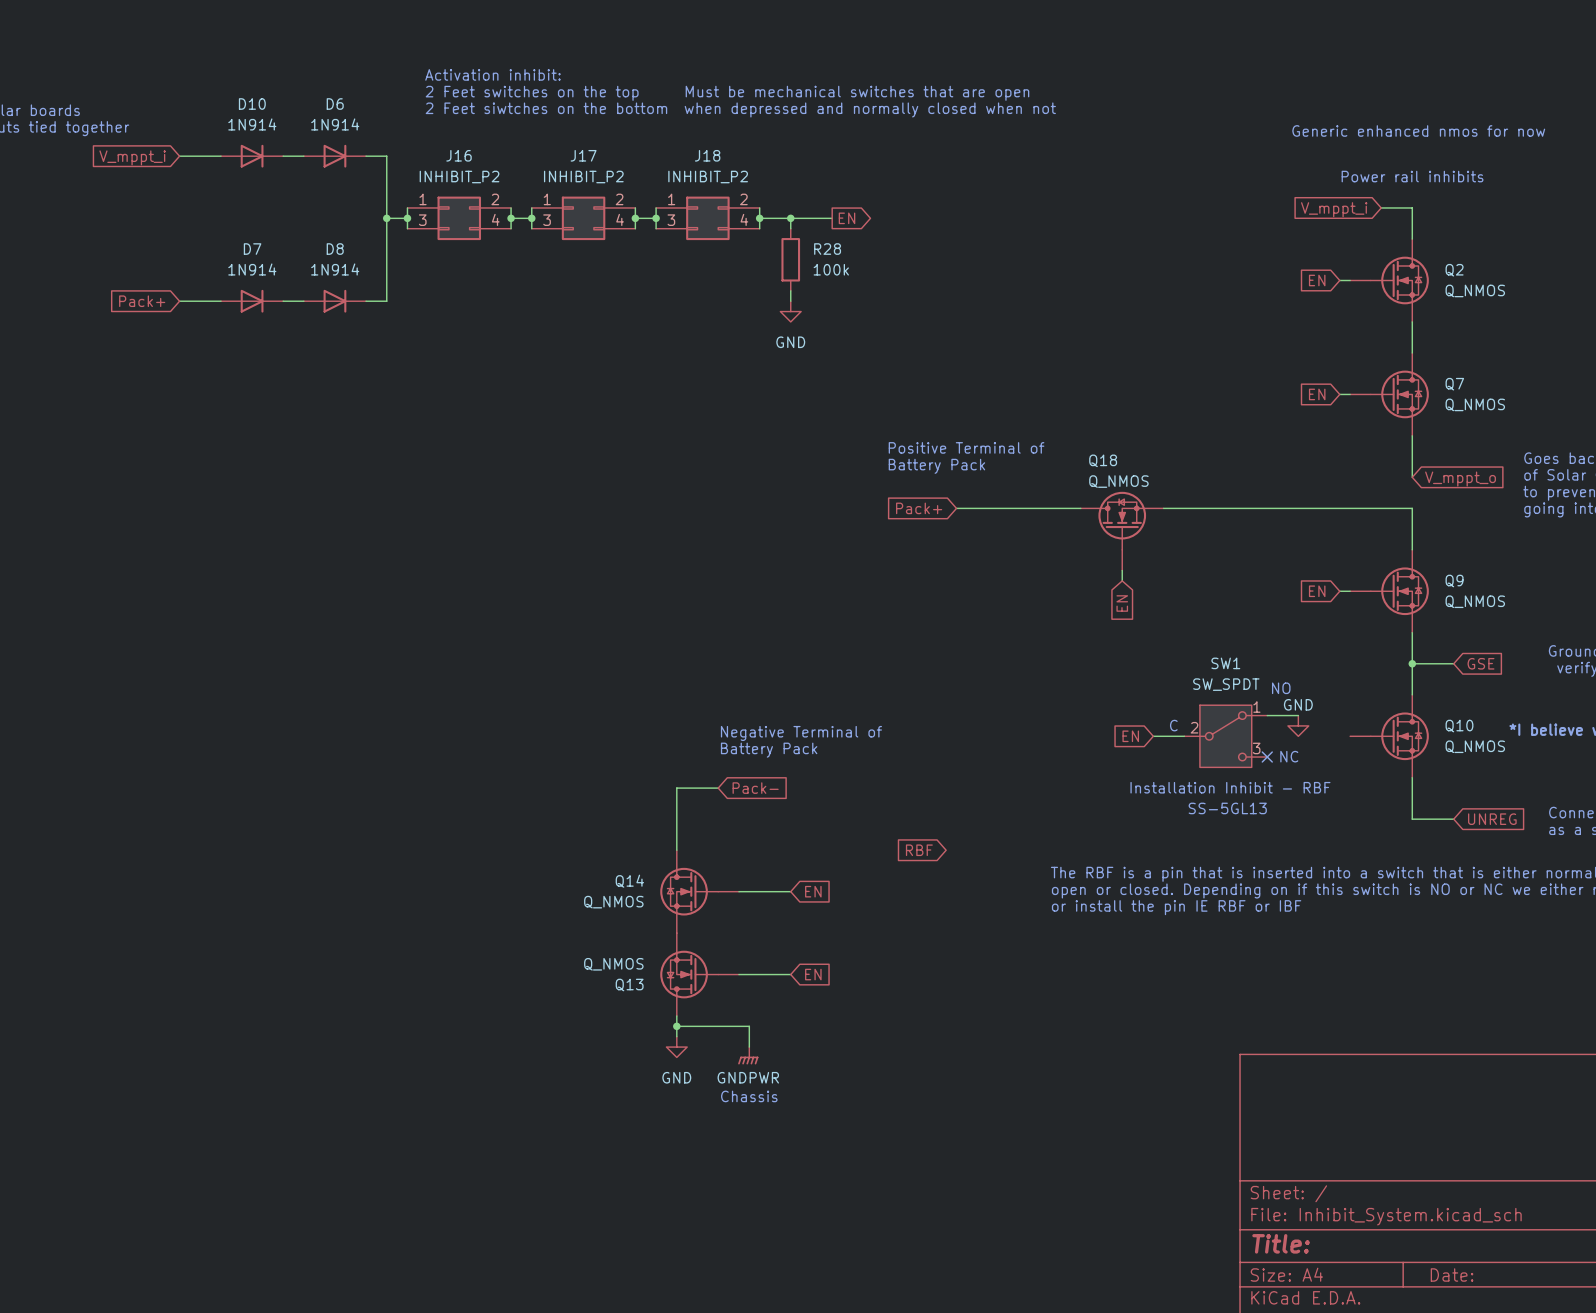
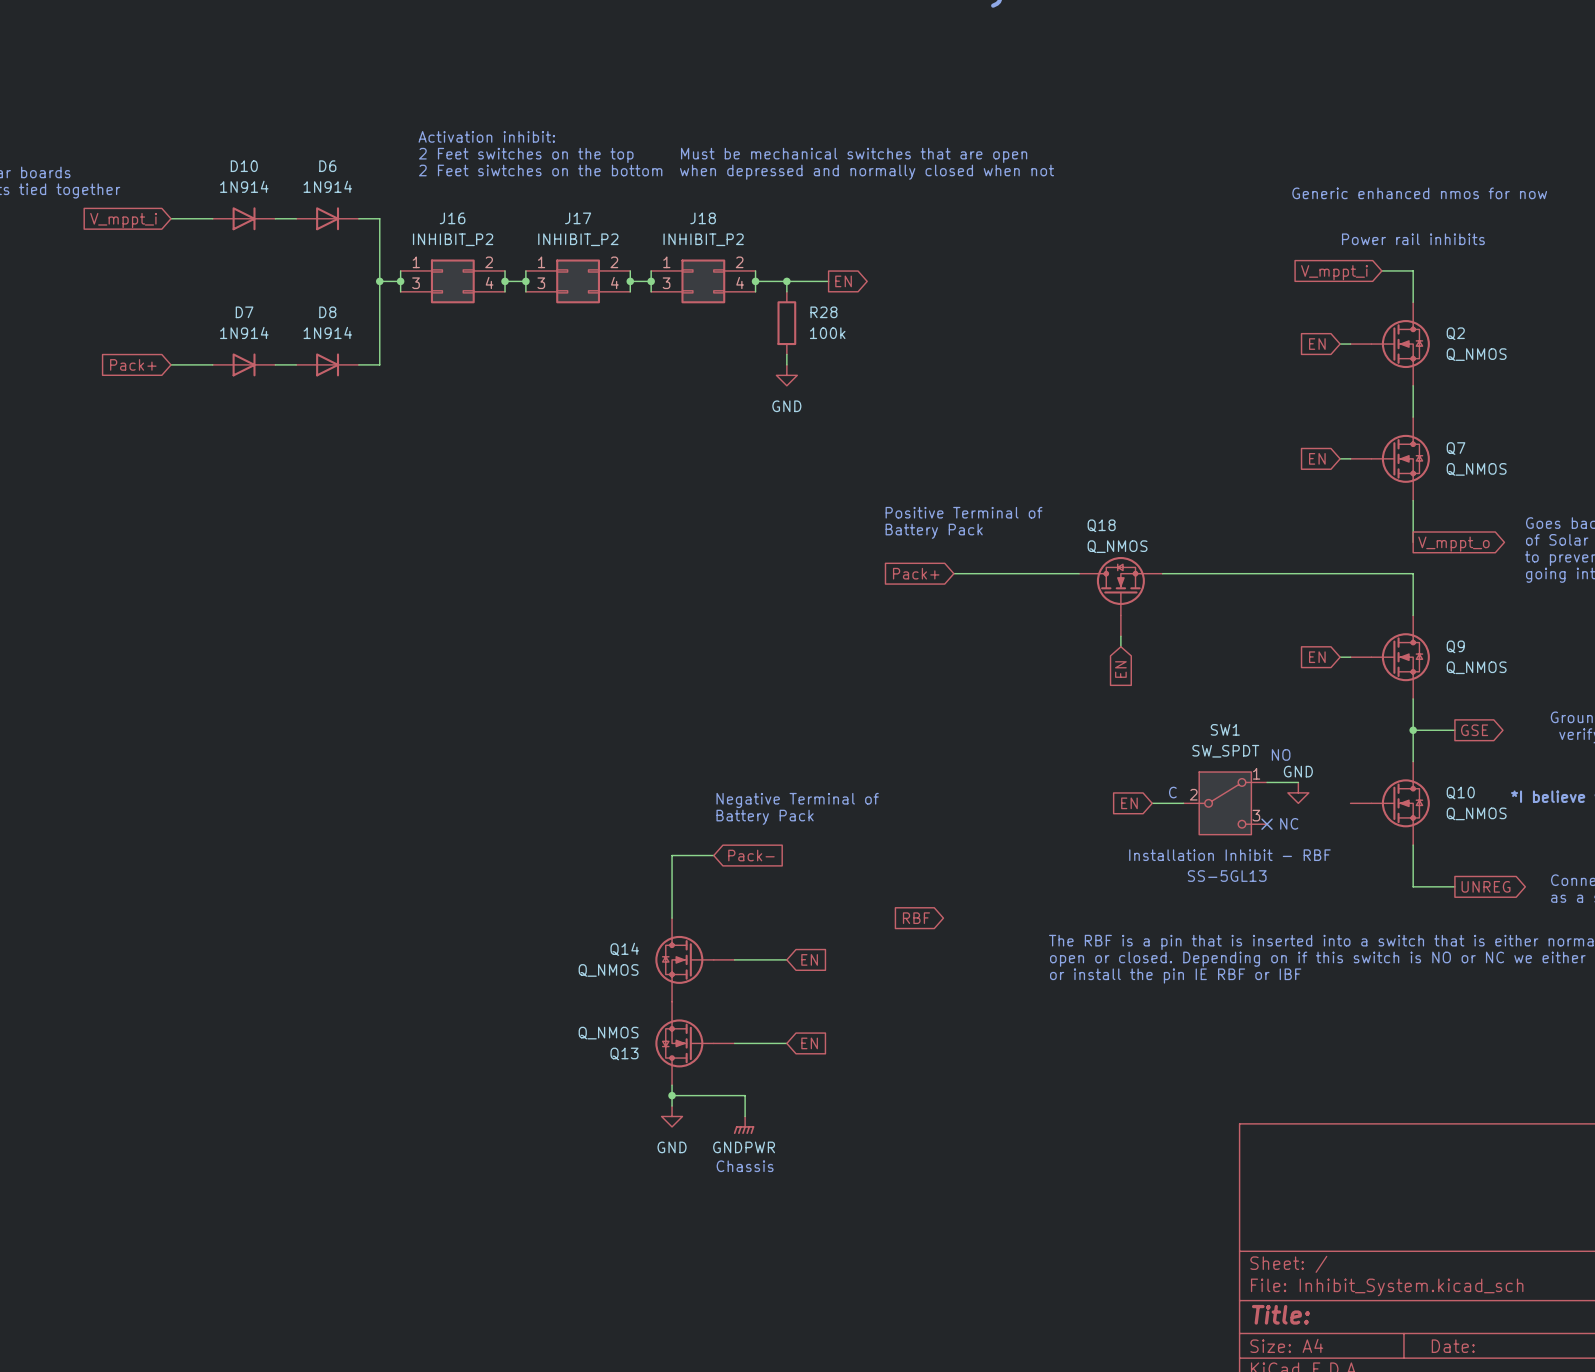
global label shape: input (1460, 479) -> output (1453, 544)
global label shape: input (1481, 663) -> output (1474, 730)
global label shape: input (1492, 819) -> output (1486, 886)

